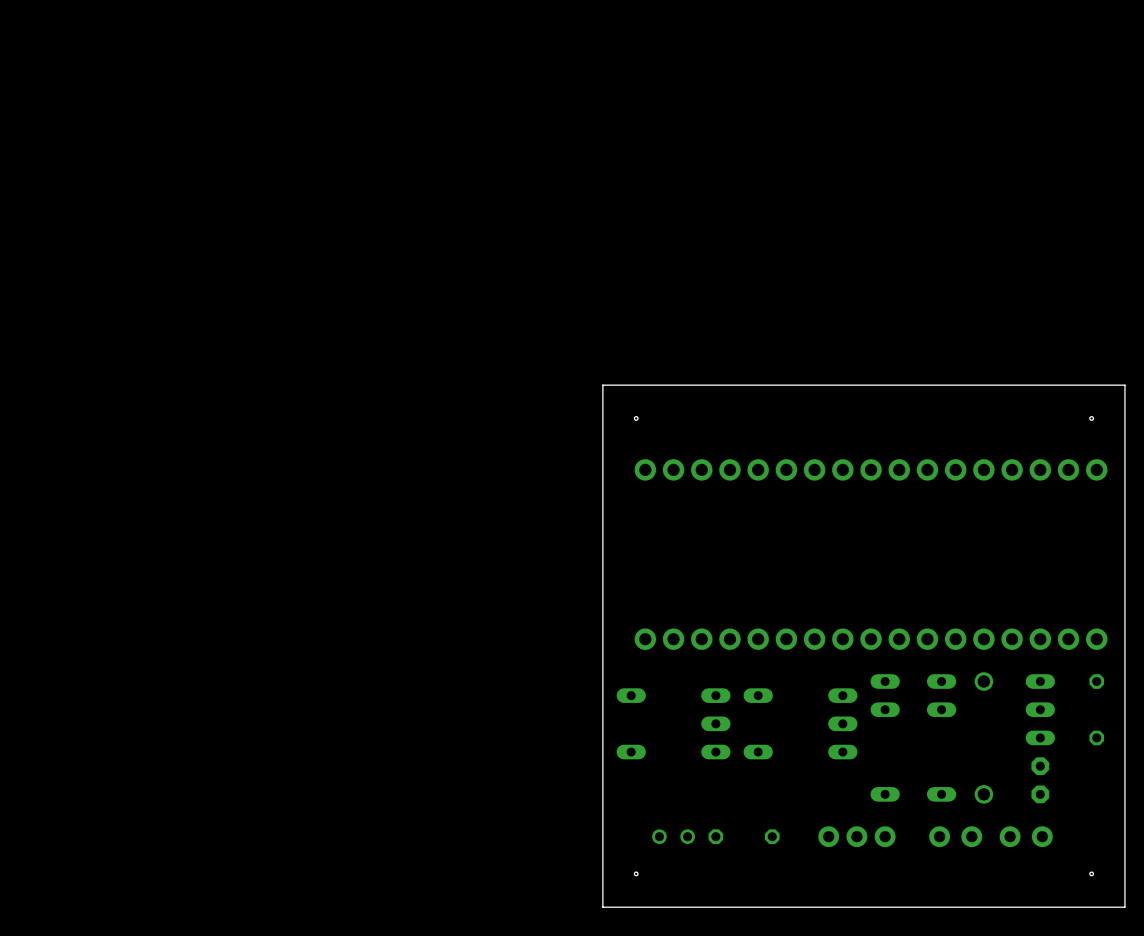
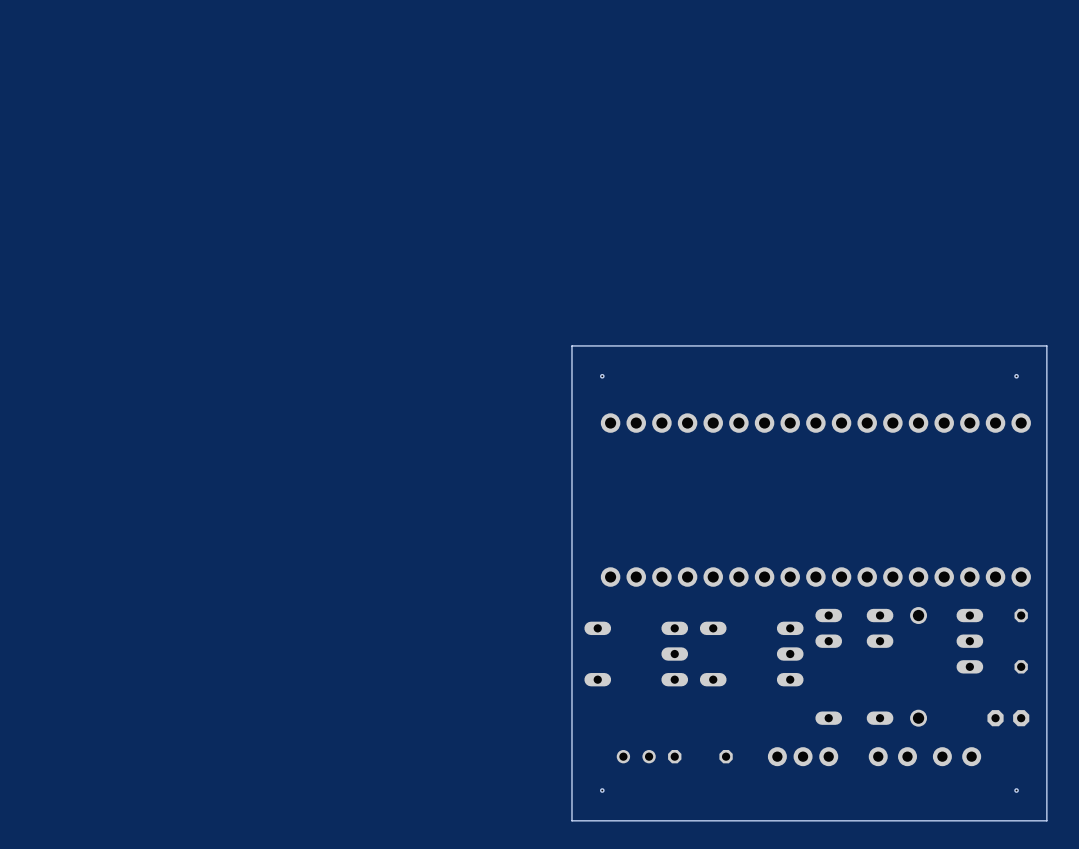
part rotation: 0° (1040, 780) -> 90° clockwise (1008, 718)
part position: (1040, 780) -> (1008, 718)

